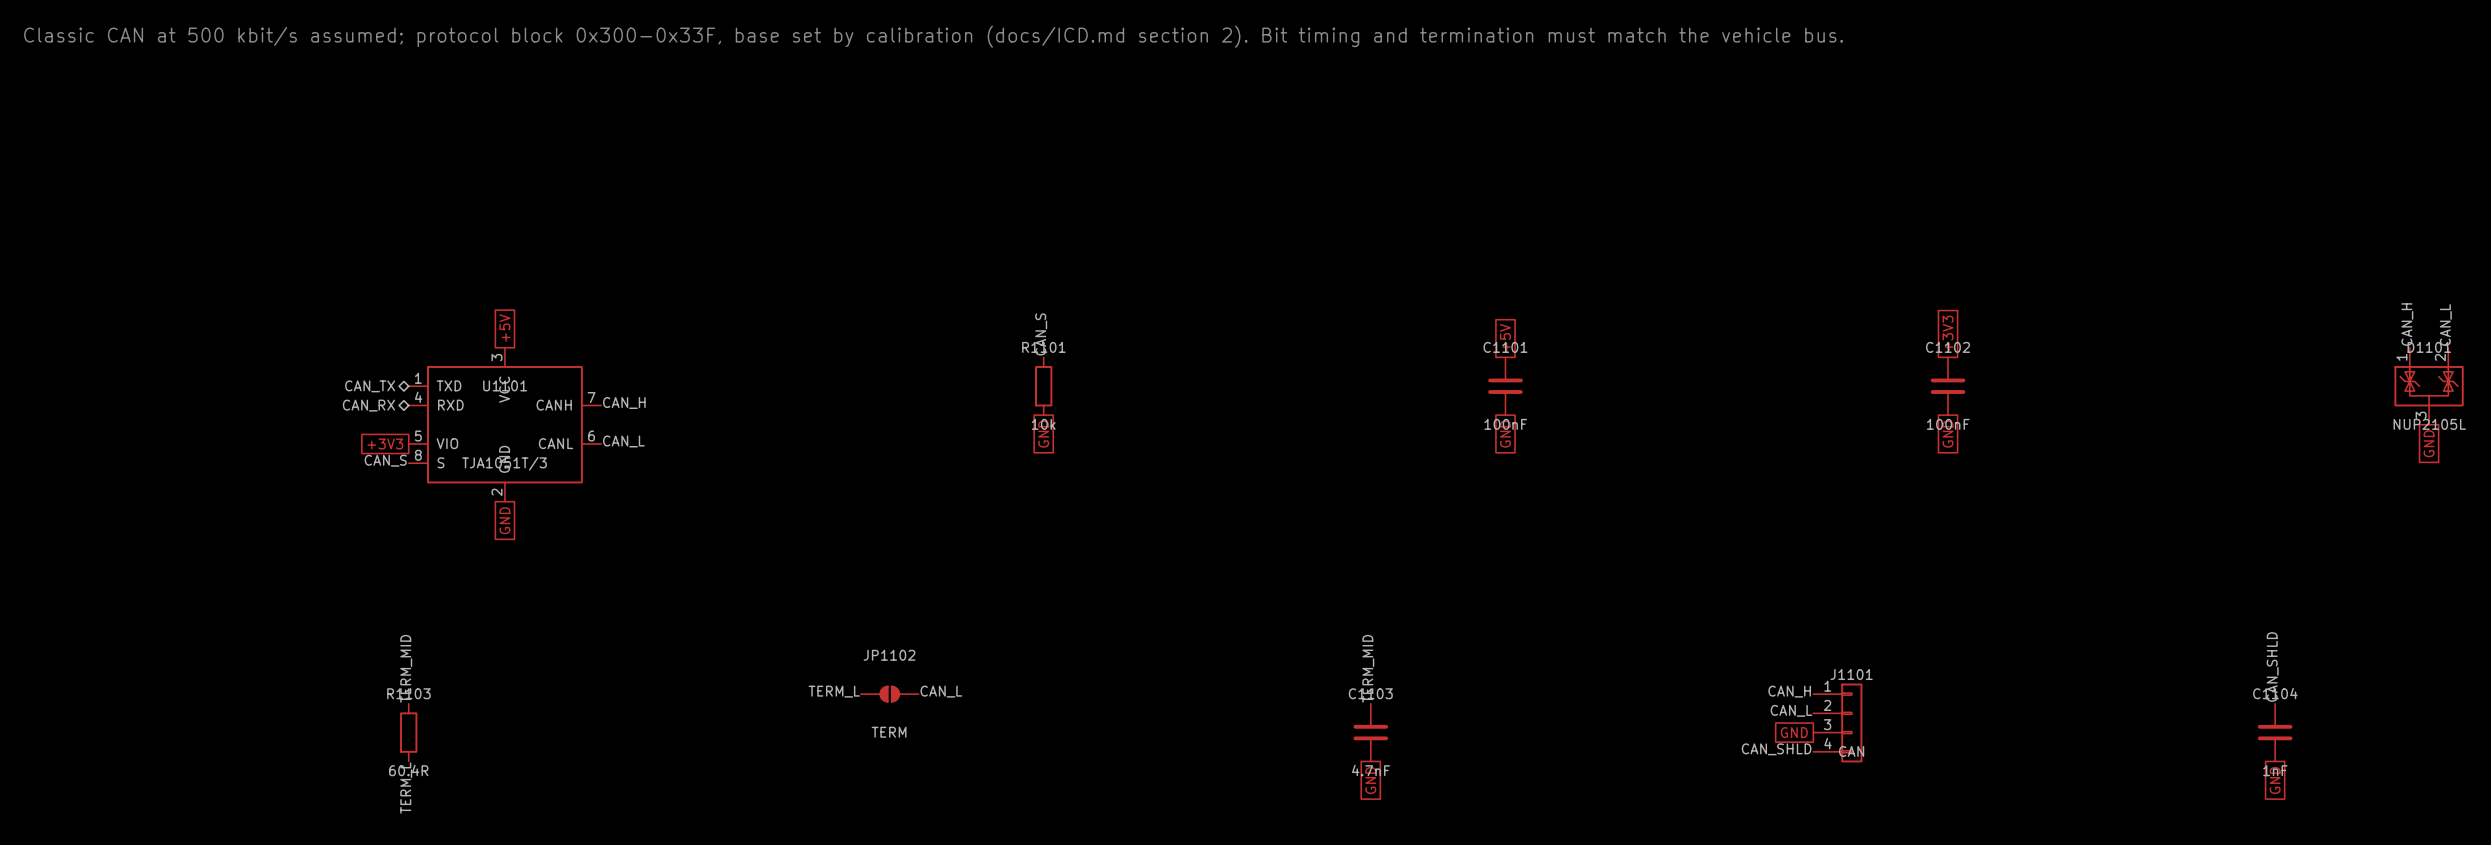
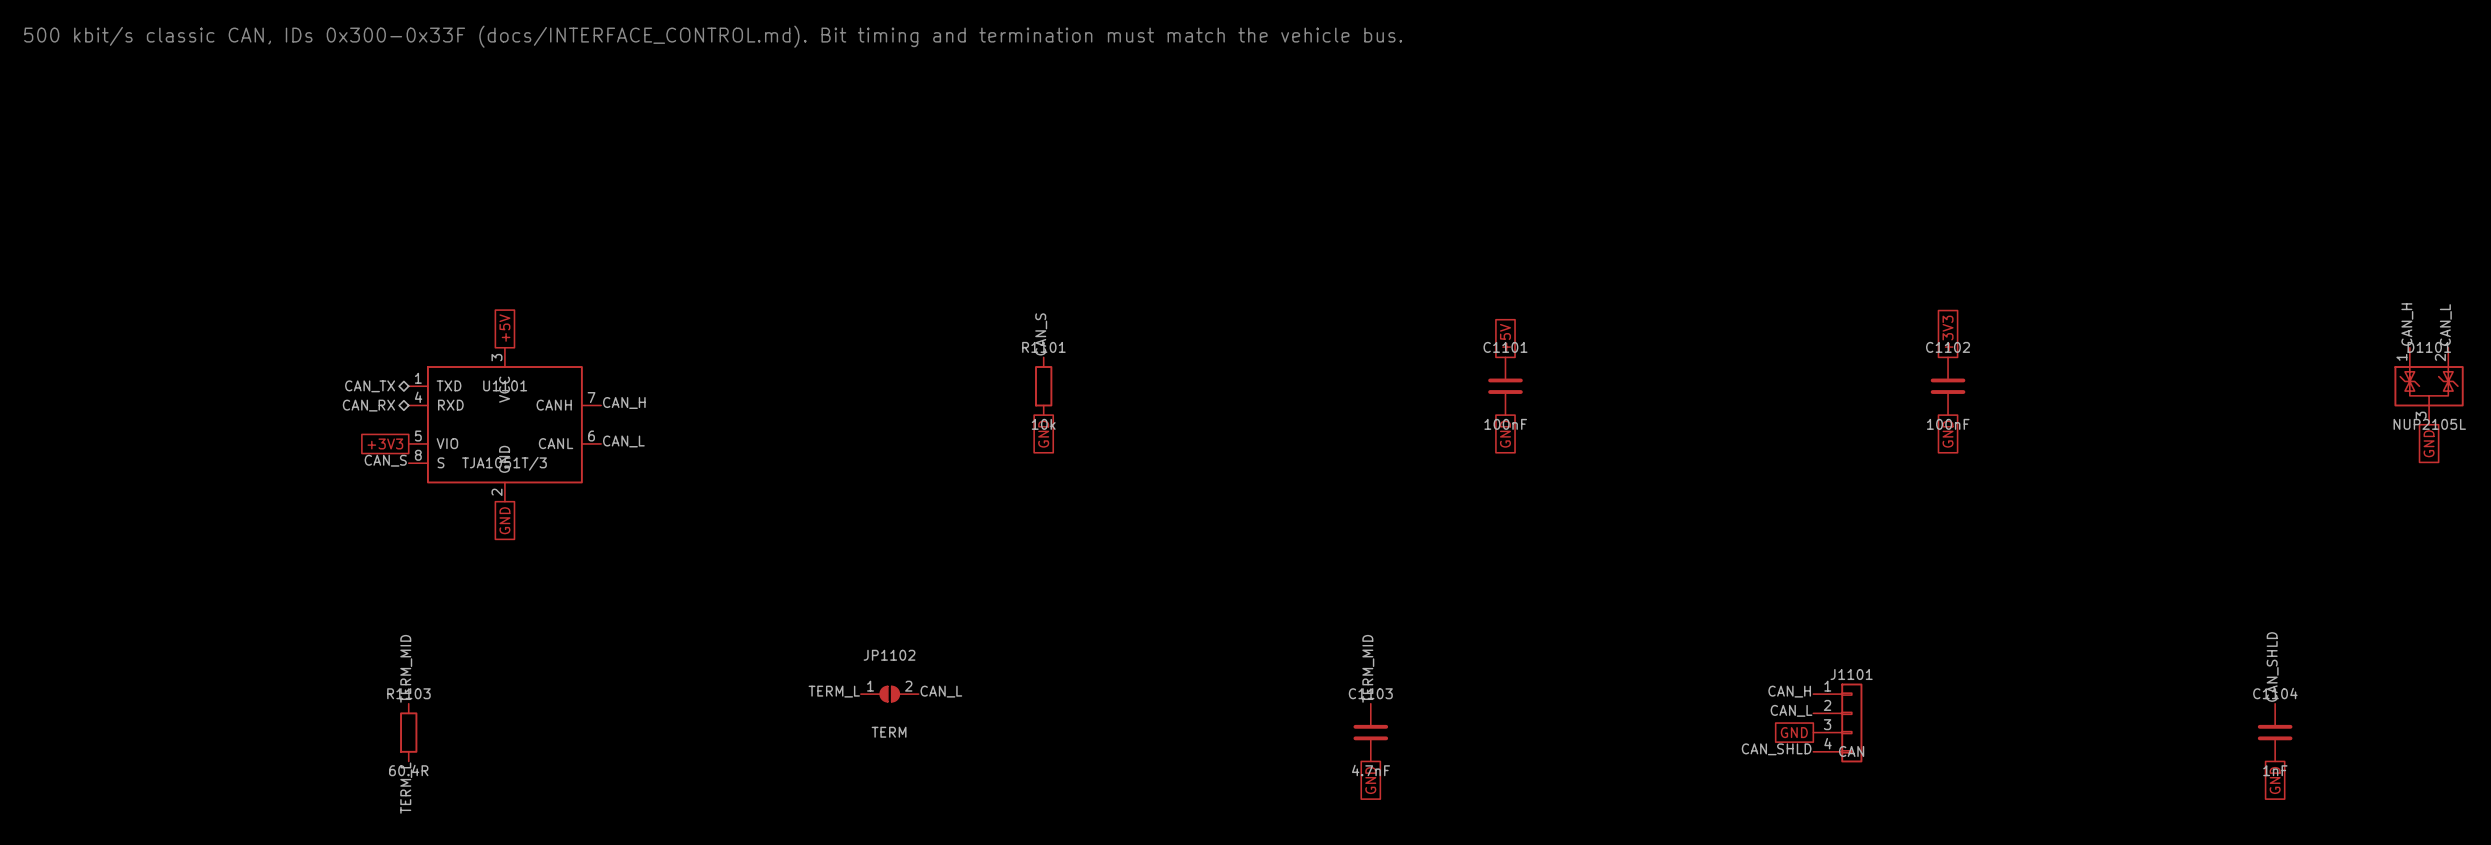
text: Classic CAN at 500 kbit/s assumed; protocol block 0x300-0x33F, base set by calibration (docs/ICD.md section 2). Bit timing and termination must match the vehicle bus. (933, 36) -> 500 kbit/s classic CAN, IDs 0x300-0x33F (docs/INTERFACE_CONTROL.md). Bit timing and termination must match the vehicle bus. (713, 36)
JP1102 pin number: none -> 1 (870, 686)
JP1102 pin number: none -> 2 (908, 686)

